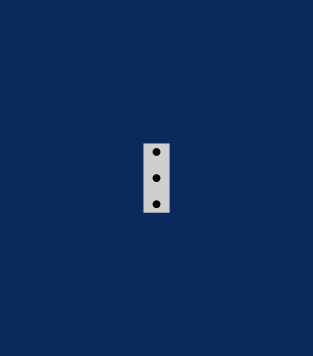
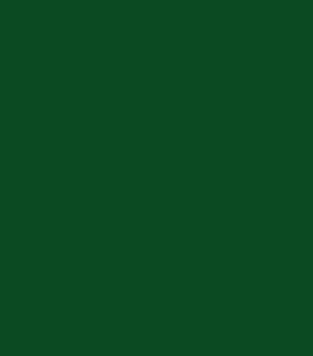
part: (156, 178) -> none

